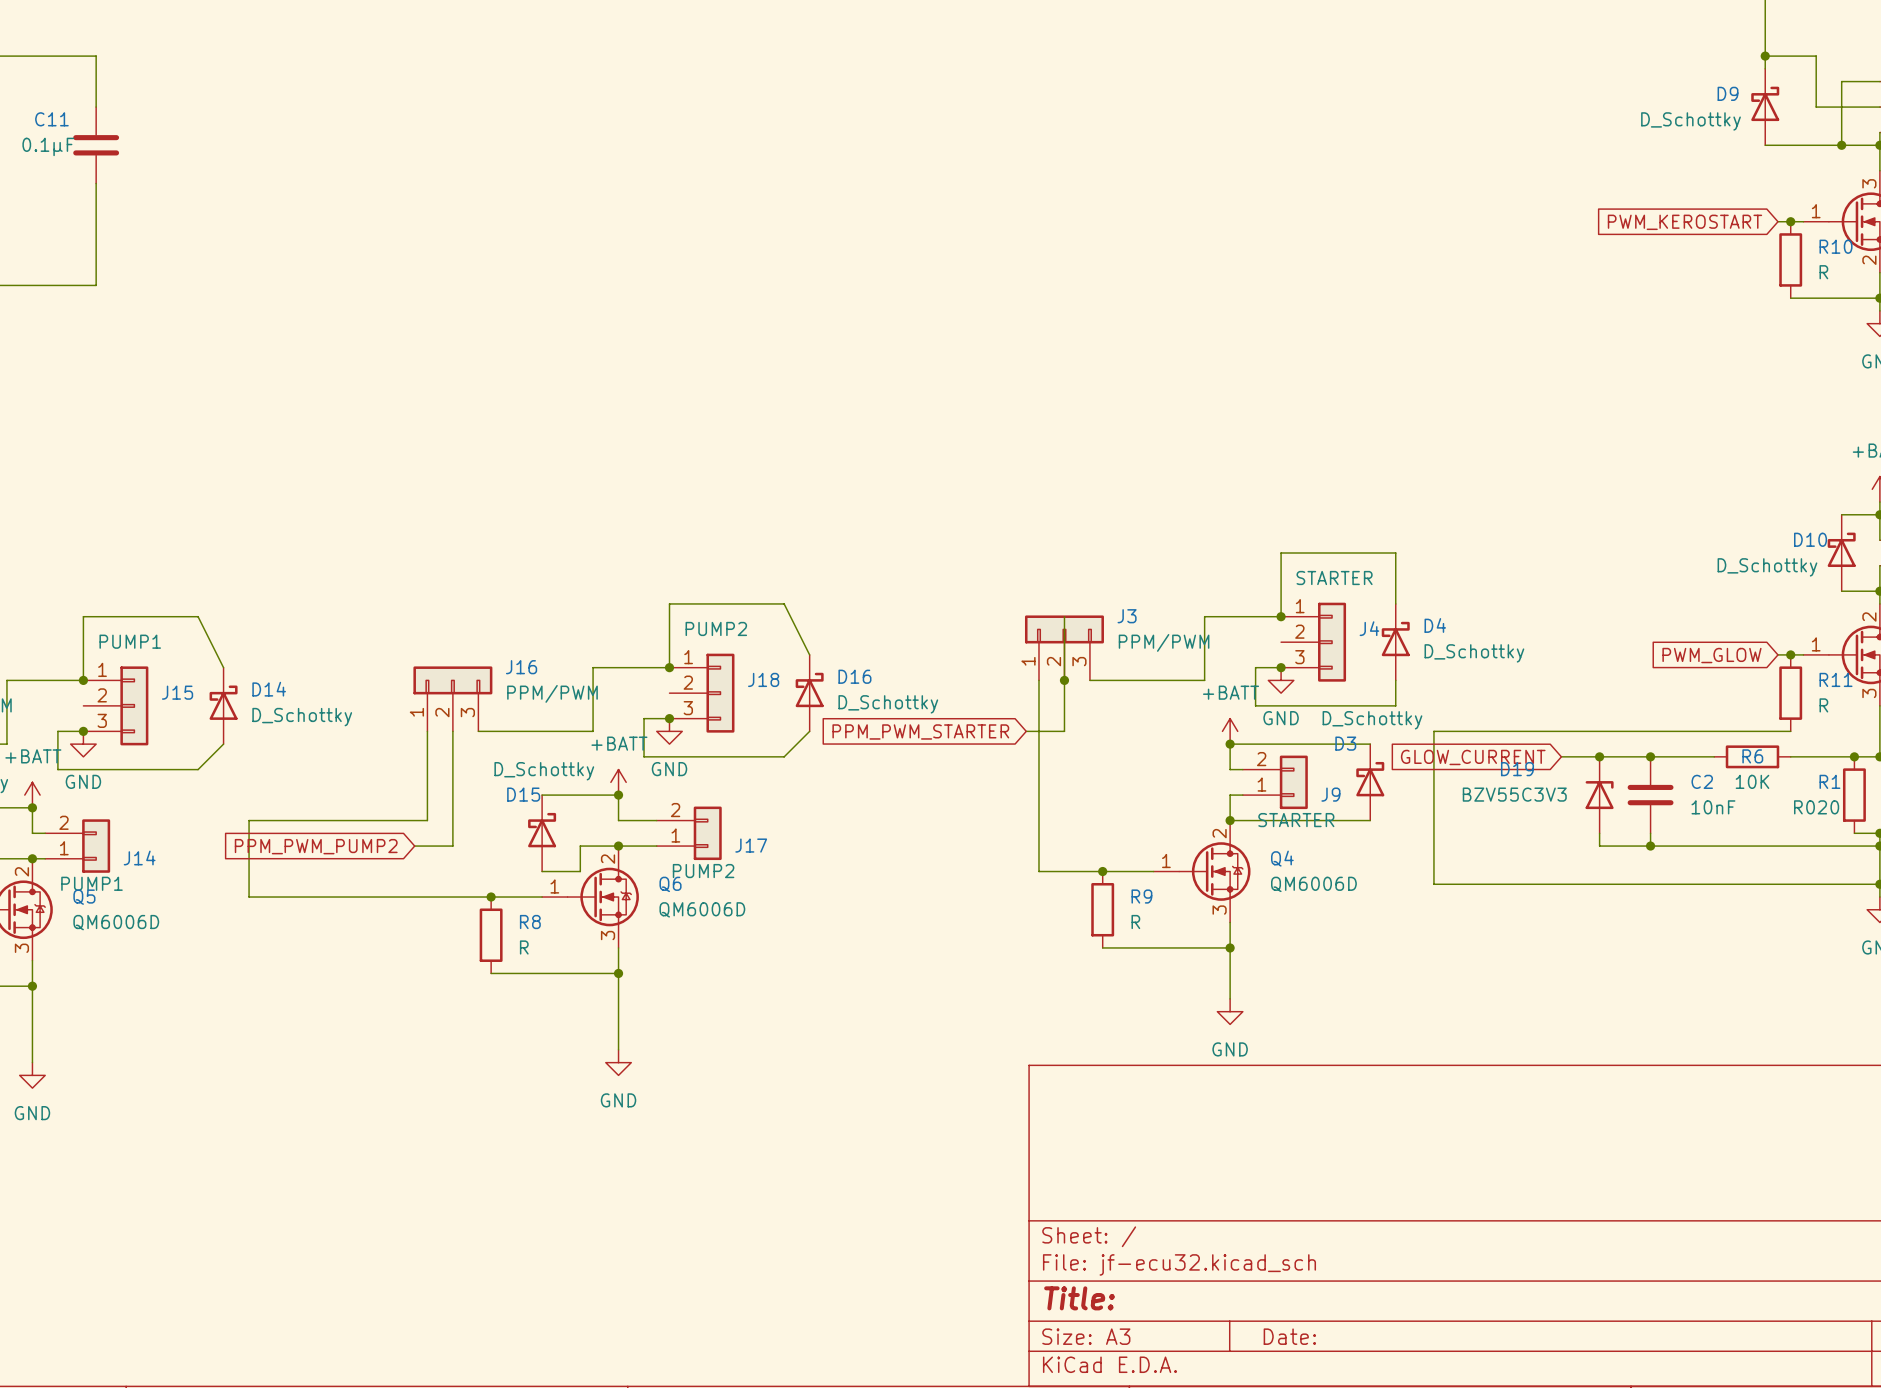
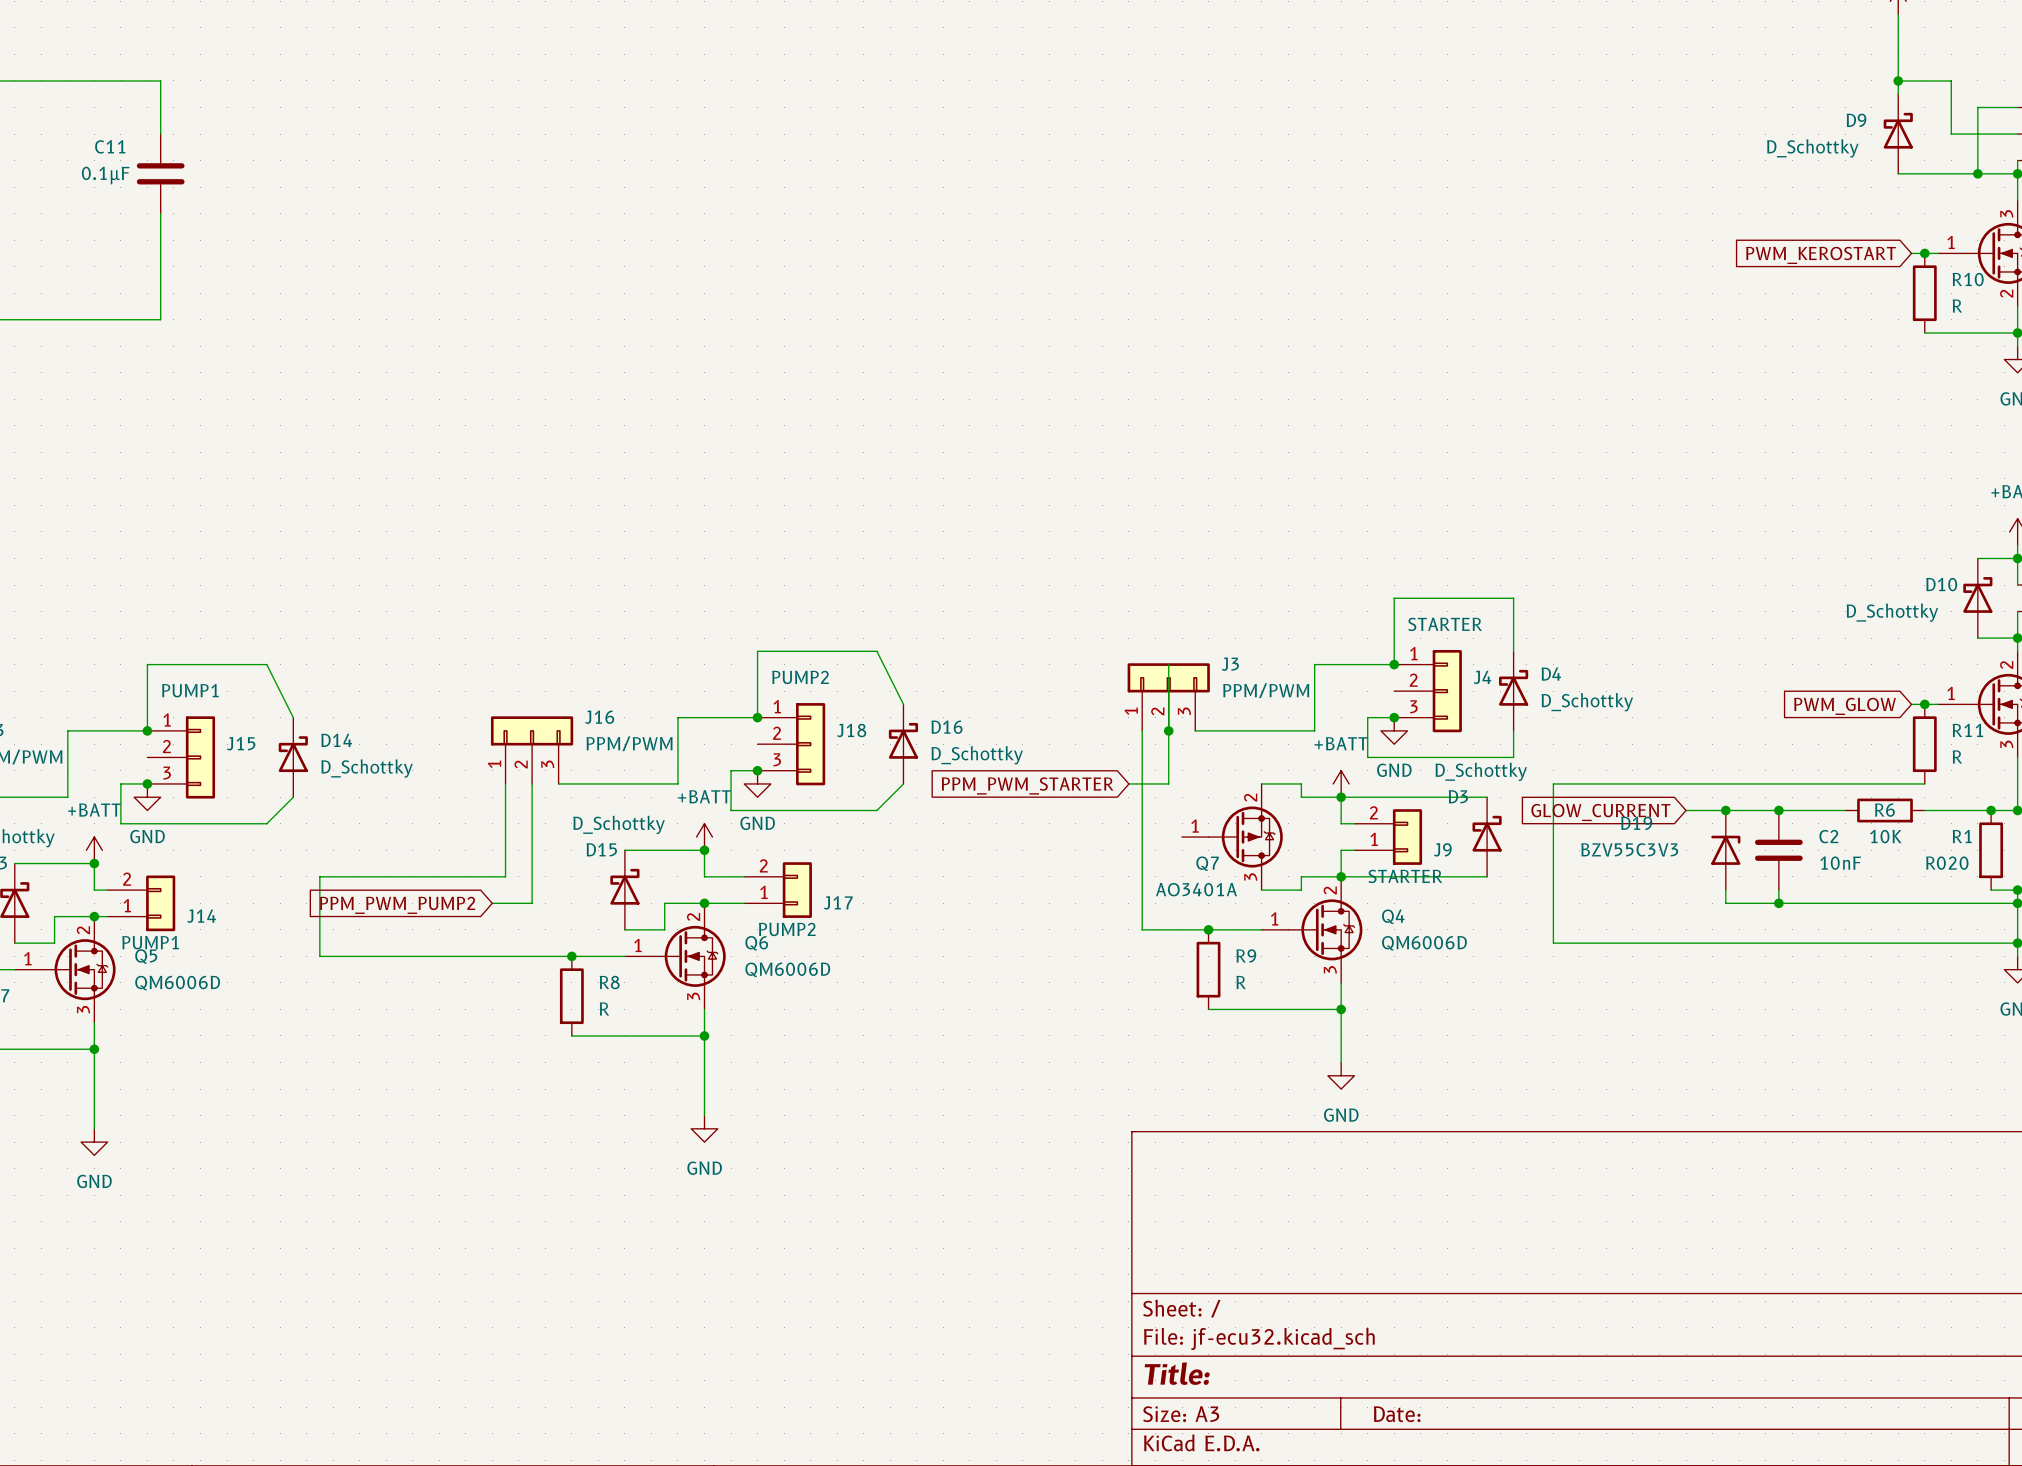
wire: none -> (1261, 783) (1301, 783) (1301, 797) (1341, 797)
Q7: none -> AO3401A (1232, 837)
wire: none -> (1341, 876) (1301, 876) (1301, 890) (1261, 890)

